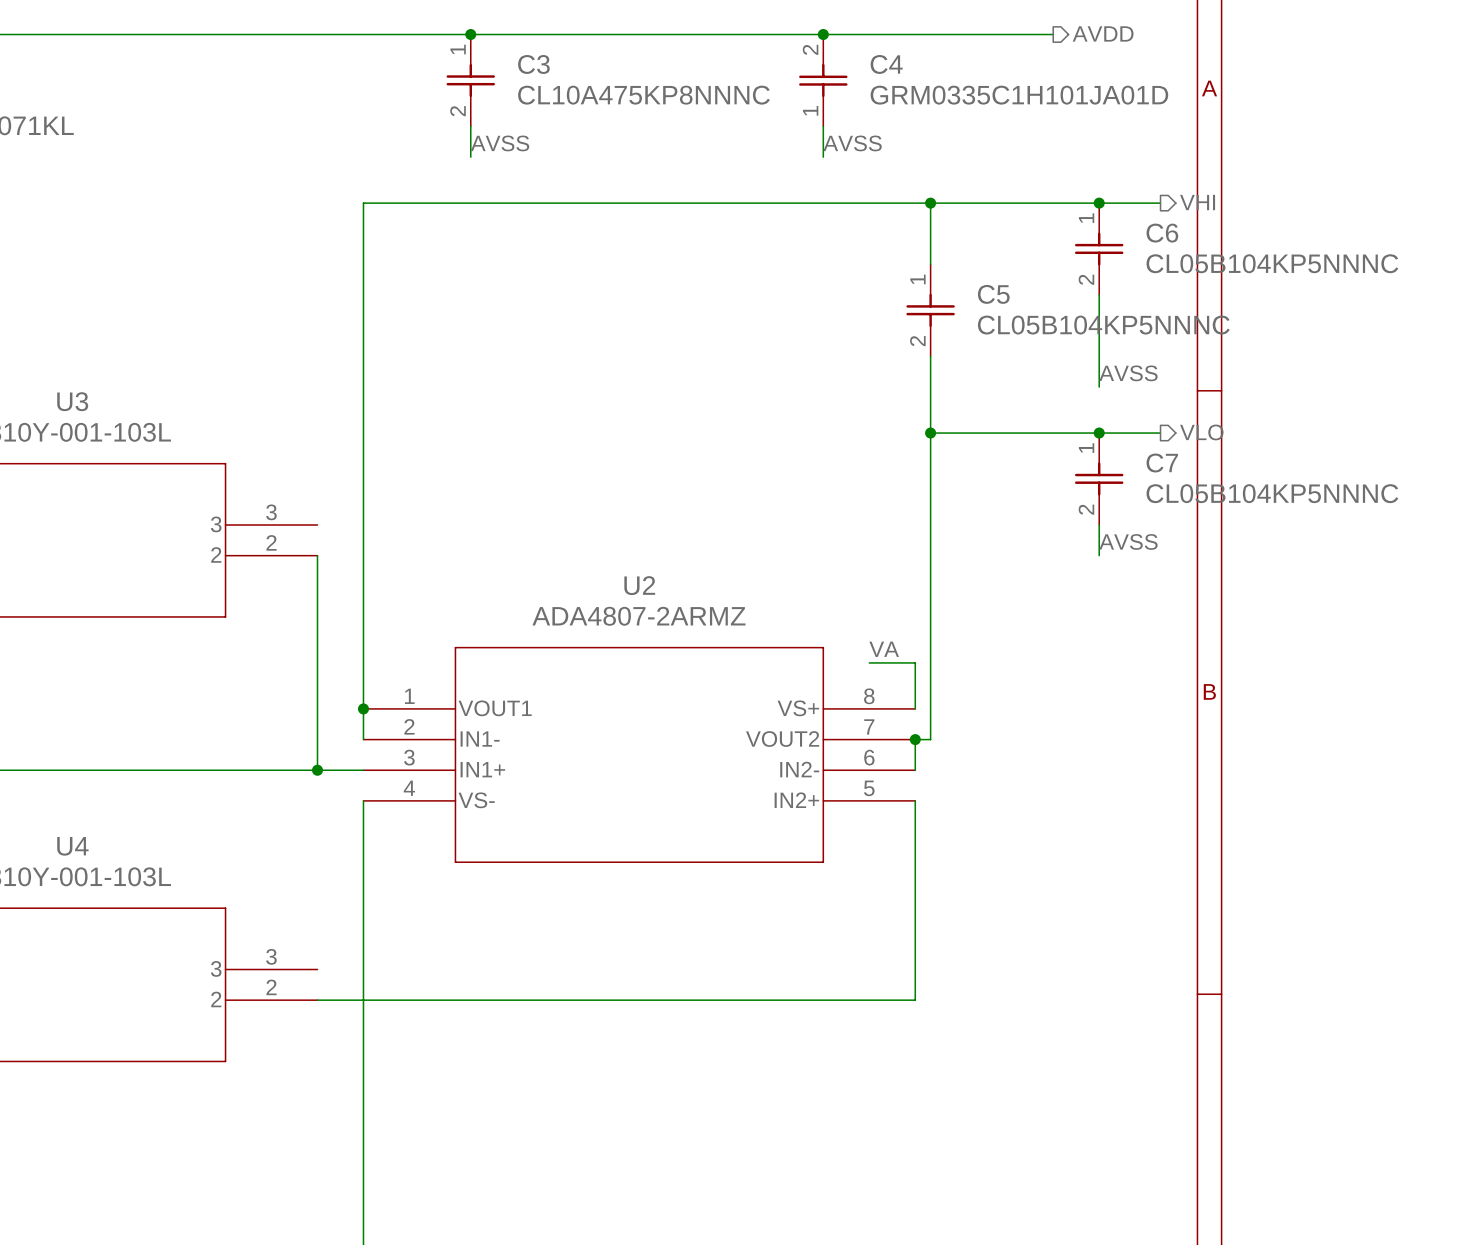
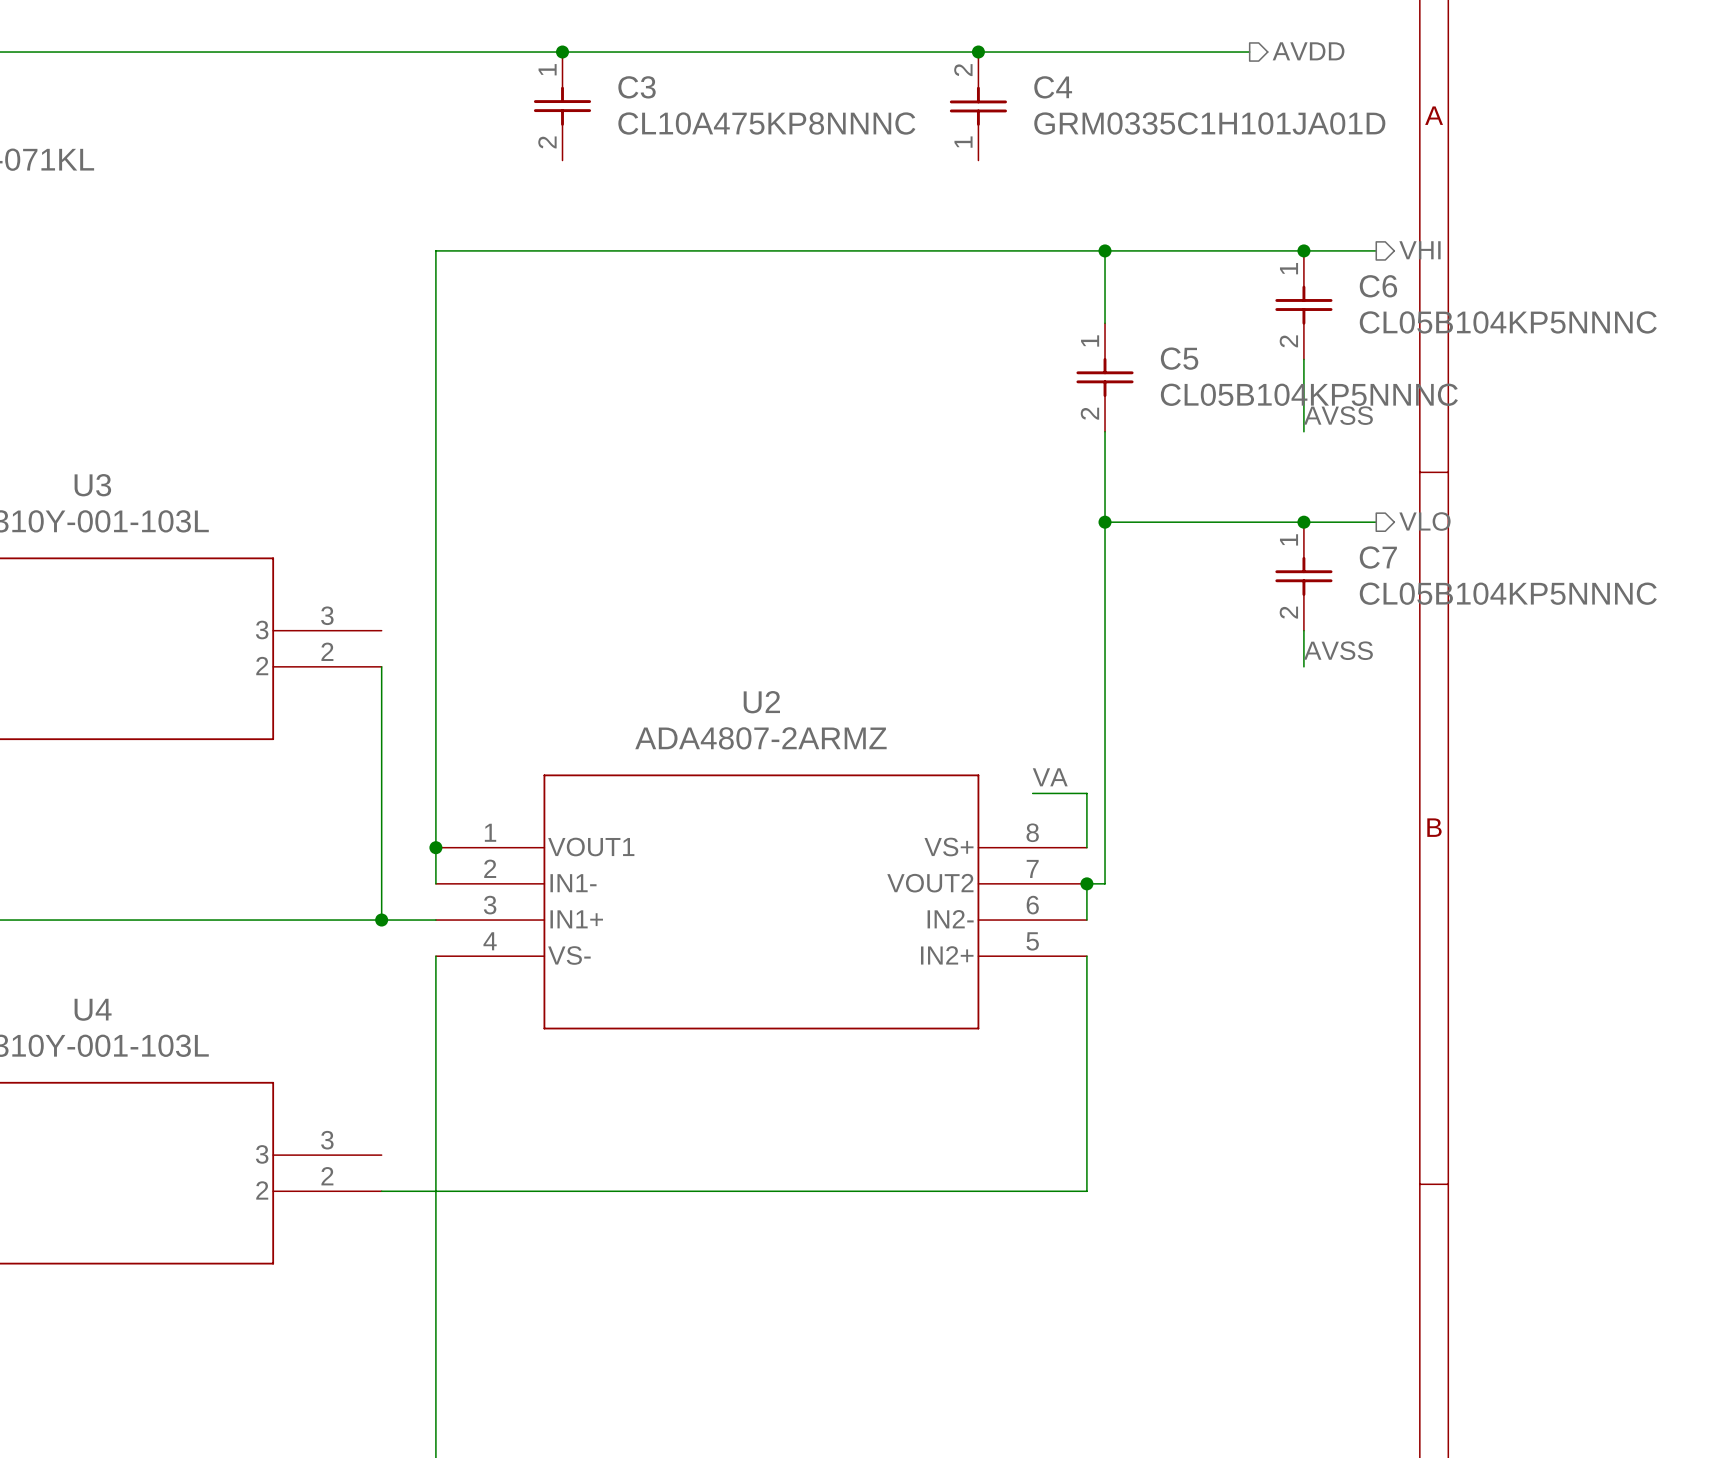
wire: (470, 126) (470, 157) -> none
wire: (823, 126) (823, 157) -> none
label: AVSS (500, 143) -> none
label: AVSS (852, 143) -> none
wire: (1099, 356) (1099, 387) -> none
label position: AVSS (1128, 373) -> AVSS (1338, 415)

